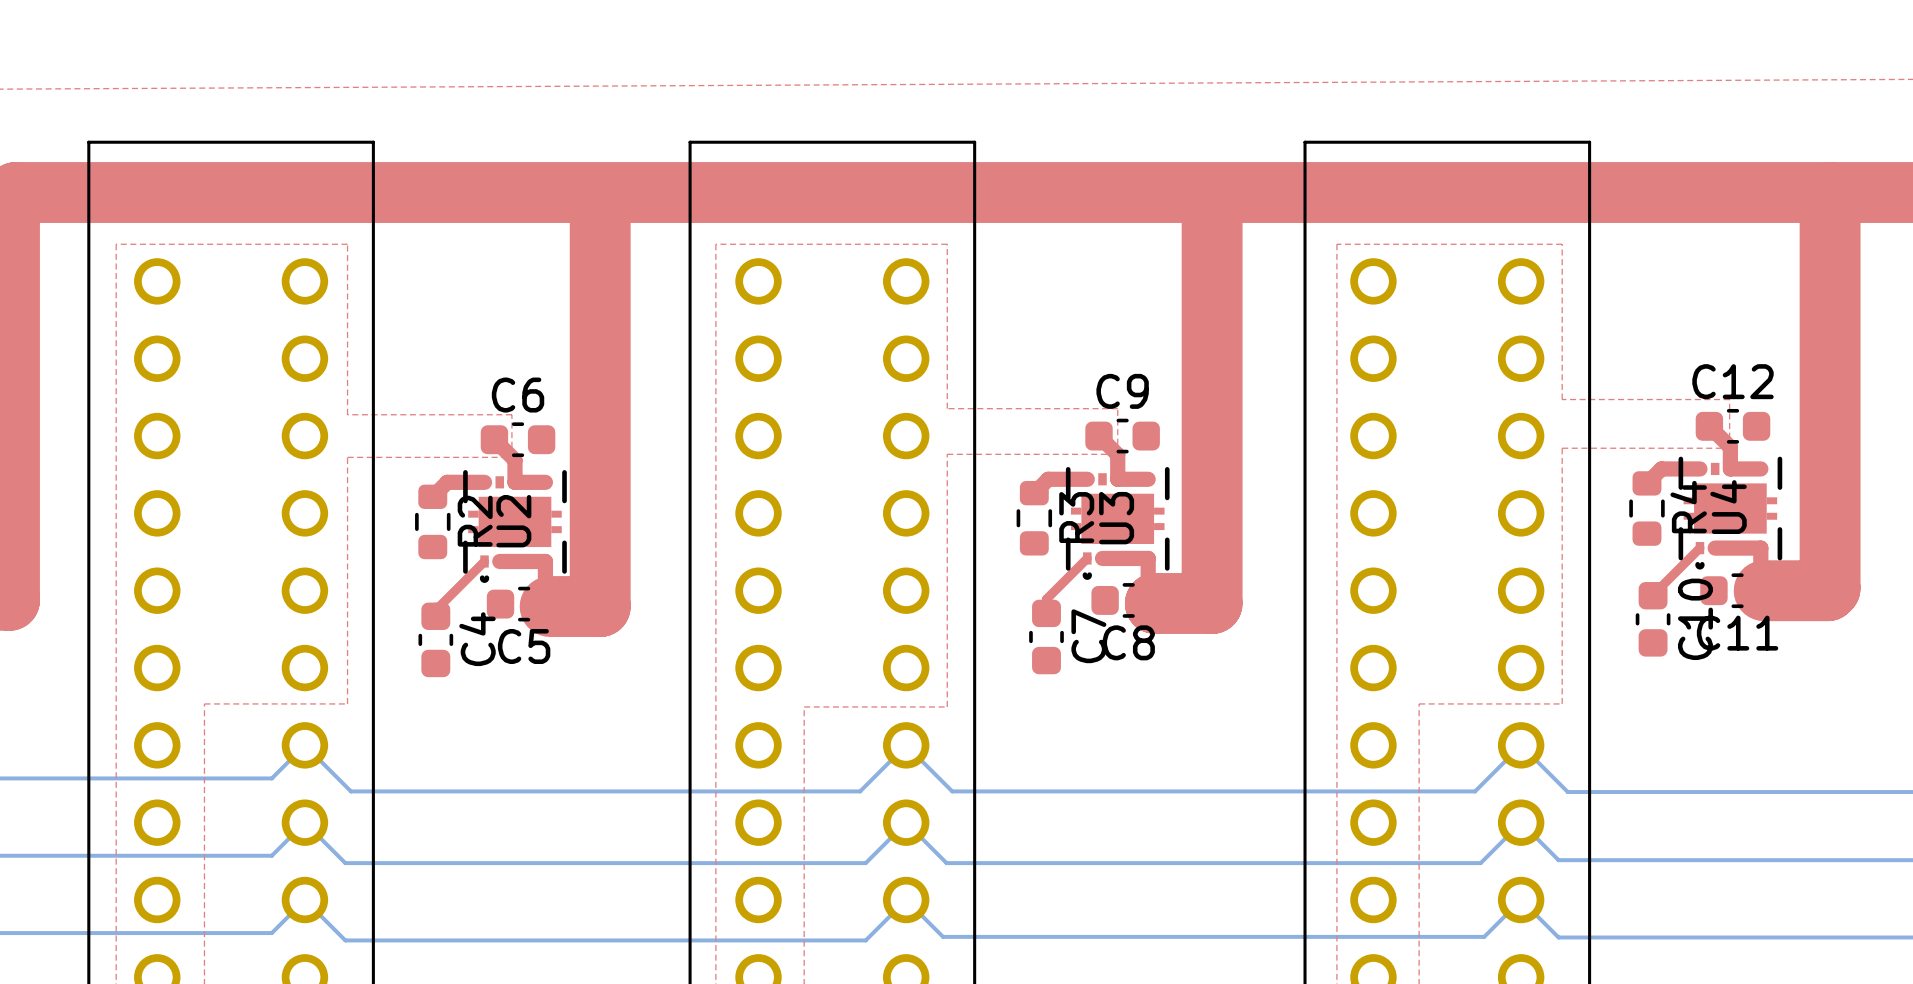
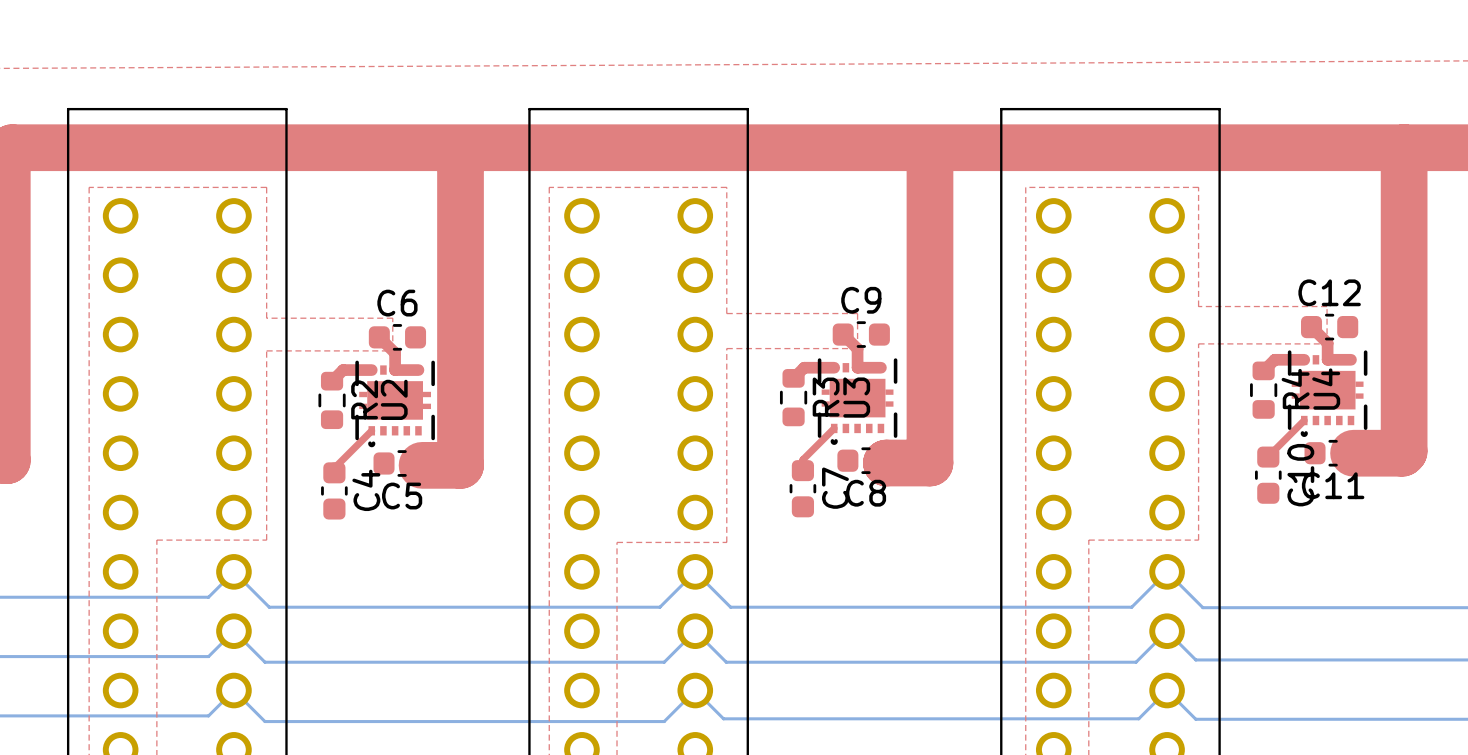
top track: (1715, 548) (1760, 548) (1760, 590) -> none
top track: (1102, 558) (1148, 558) (1148, 596) (1152, 600) -> none
top track: (499, 561) (545, 561) (545, 601) (550, 606) -> none

